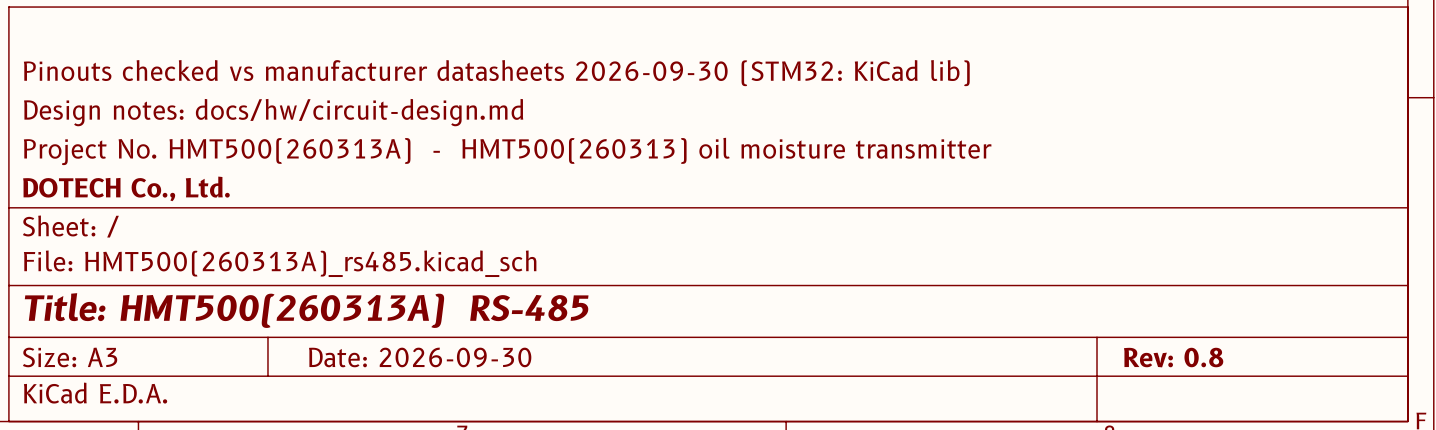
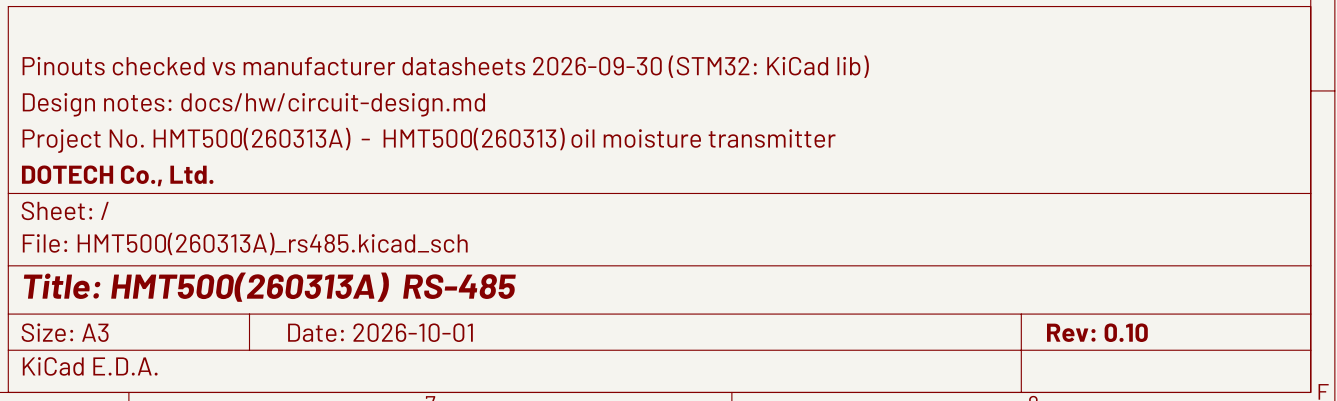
title block: Date: 2026-09-30 (420, 357) -> Date: 2026-10-01 (380, 332)
title block: Rev: 0.8 (1173, 357) -> Rev: 0.10 (1097, 332)

